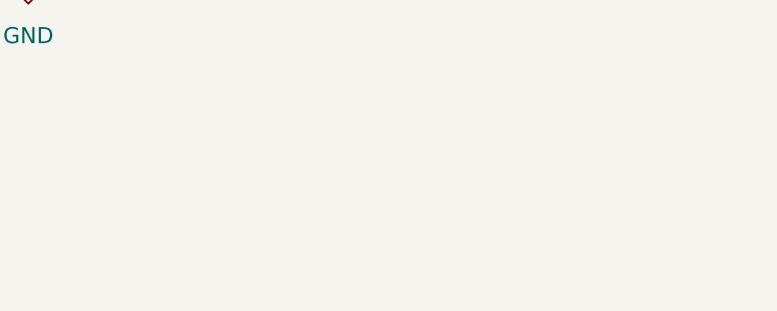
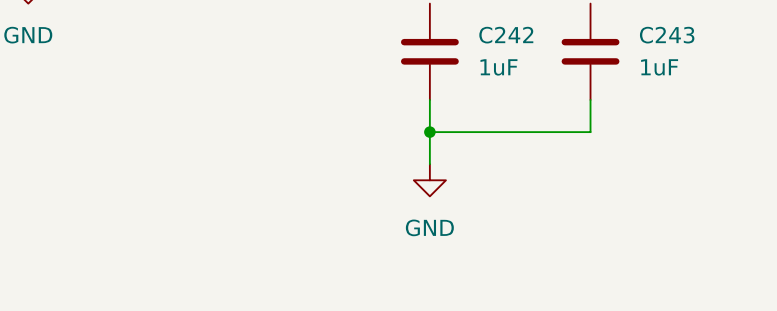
C242: none -> 1uF (429, 51)
C243: none -> 1uF (590, 51)
wire: none -> (429, 99) (429, 164)
wire: none -> (590, 99) (590, 132) (429, 132)
junction: none -> (429, 132)
power symbol: none -> GND (429, 180)

